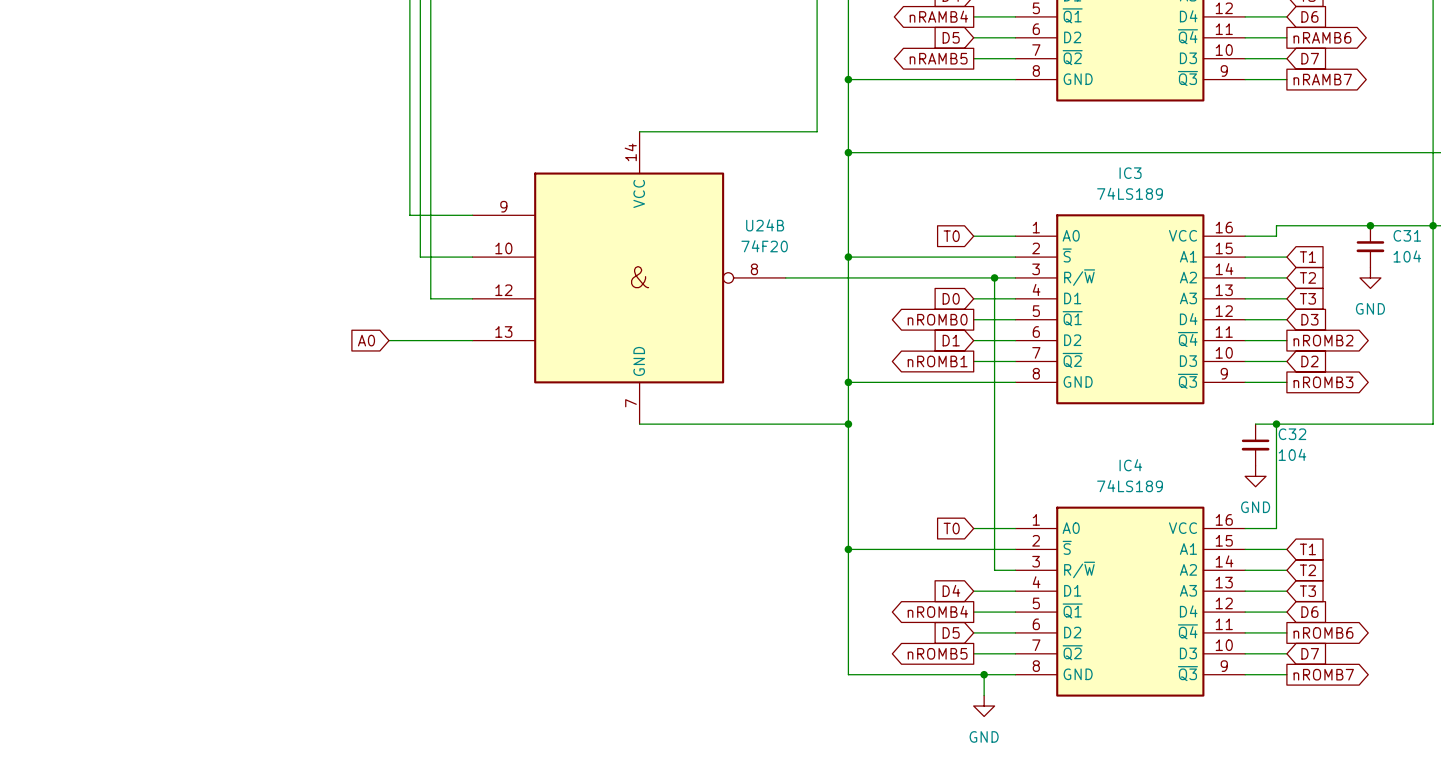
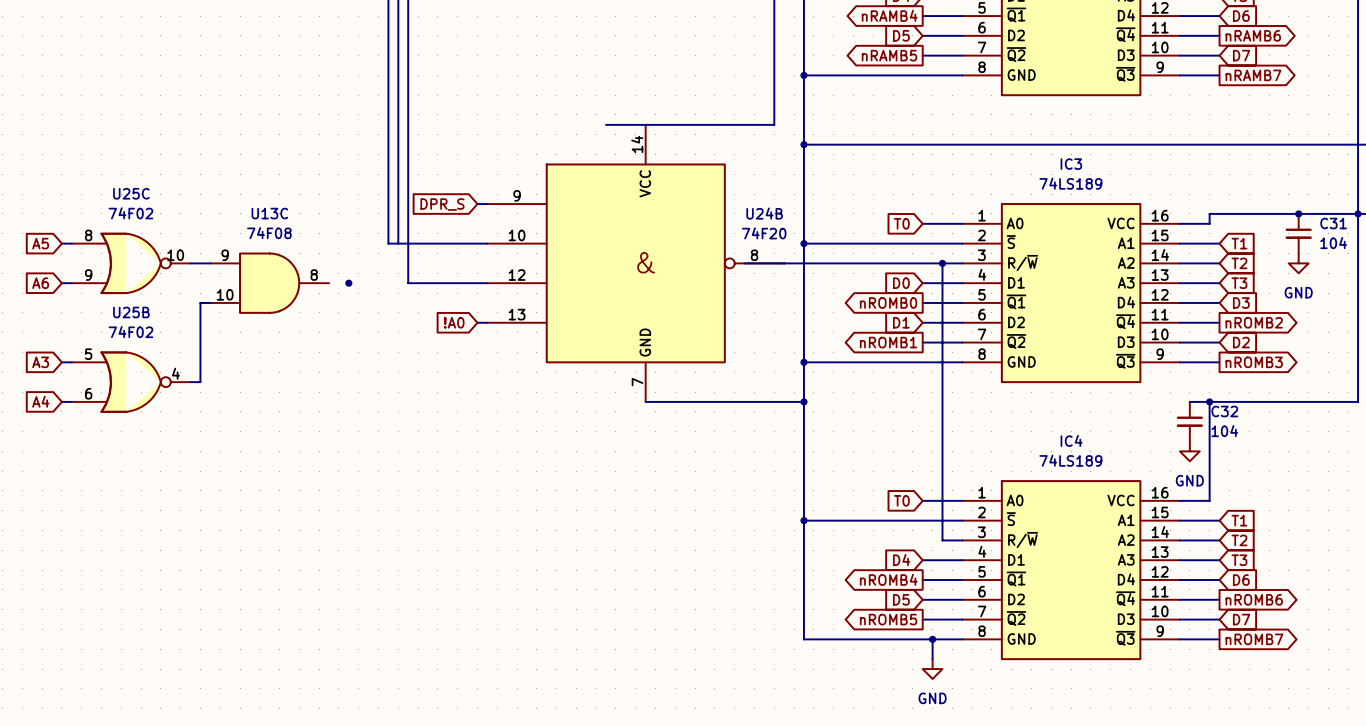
wire: (409, 215) (472, 215) -> (388, 204) (388, 243) (398, 243)
global label: none -> DPR_S (442, 204)
global label: none -> A5 (40, 243)
wire: none -> (61, 243) (71, 243)
U25C: none -> 74F02 (131, 263)
wire: none -> (190, 263) (210, 263)
U24B position: (629, 277) -> (635, 263)
global label: none -> A6 (40, 283)
wire: none -> (61, 283) (71, 283)
U13C: none -> 74F08 (269, 283)
junction: none -> (348, 283)
wire: none -> (210, 302) (200, 302) (200, 382) (190, 382)
global label: A0 (366, 340) -> none
wire: (389, 340) (472, 340) -> none
global label: none -> !A0 (454, 322)
global label: none -> A3 (40, 362)
wire: none -> (61, 362) (71, 362)
U25B: none -> 74F02 (131, 382)
global label: none -> A4 (40, 401)
wire: none -> (61, 401) (71, 401)
wire: (639, 424) (681, 424) -> none

